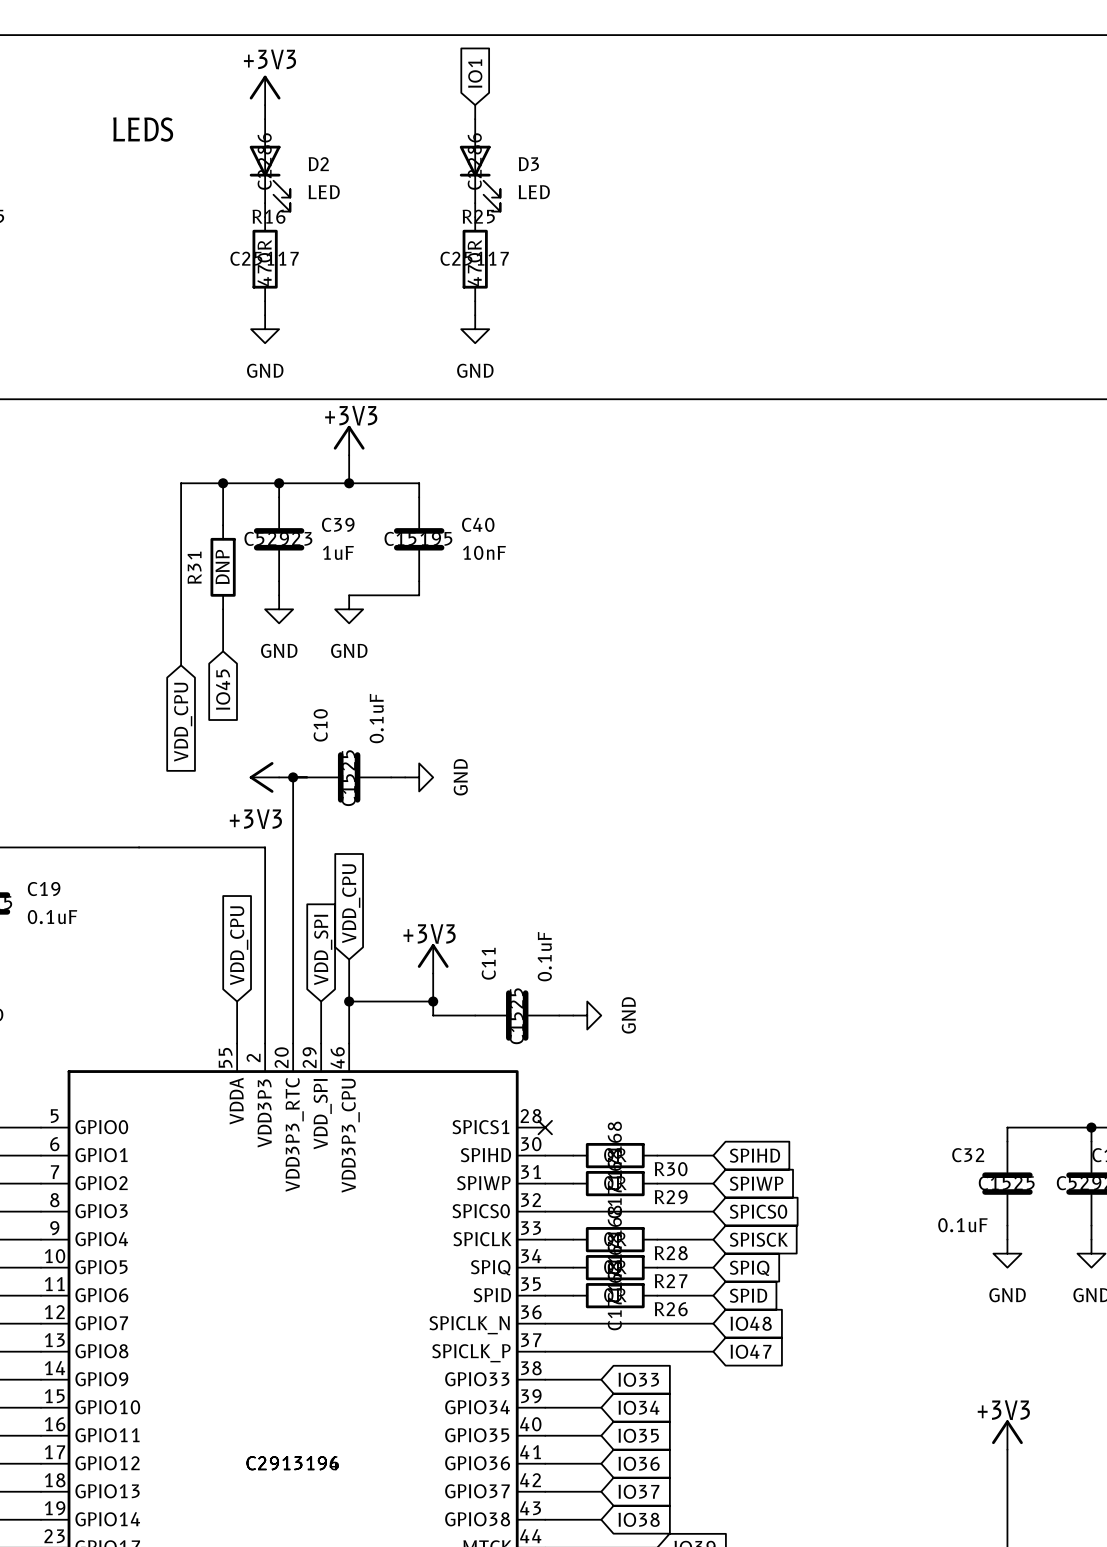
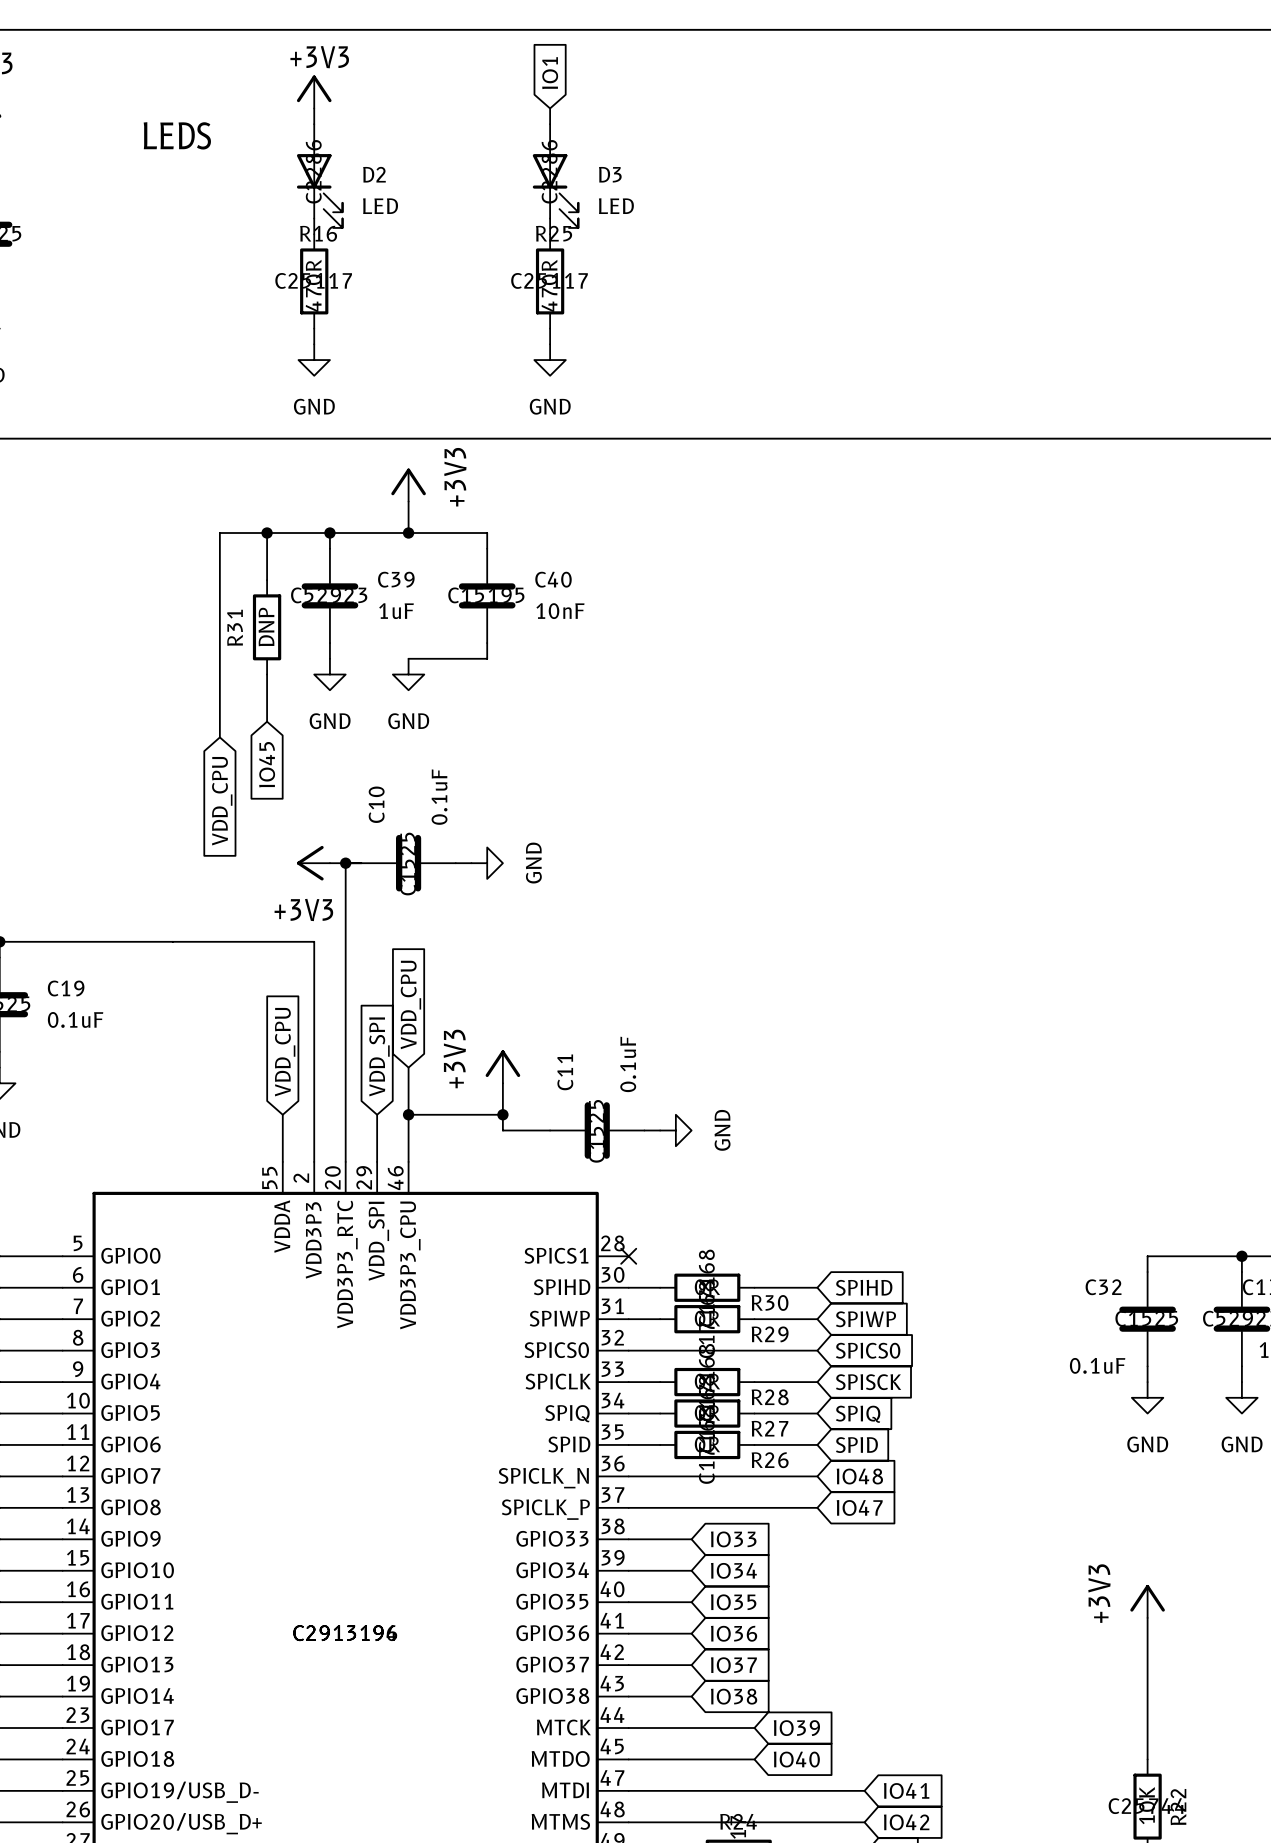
power symbol text rotation: 0° (351, 415) -> 90° counterclockwise (455, 477)
power symbol text rotation: 0° (429, 933) -> 90° counterclockwise (454, 1058)
power symbol text rotation: 0° (1003, 1410) -> 90° counterclockwise (1099, 1593)

